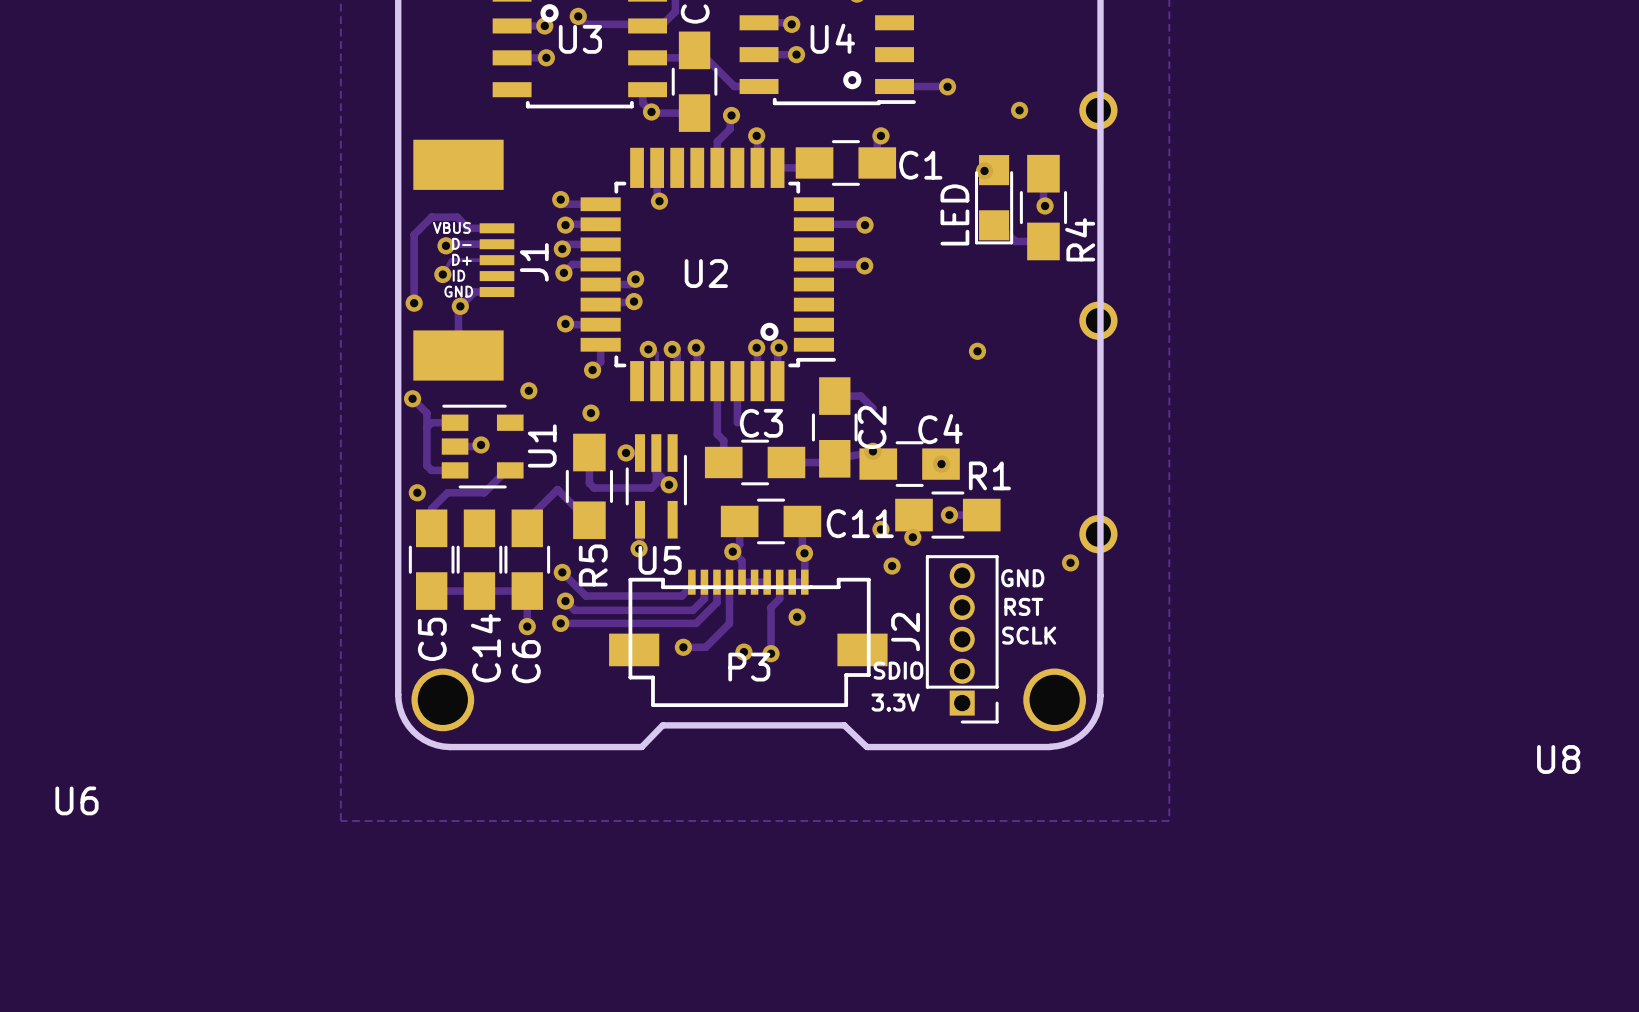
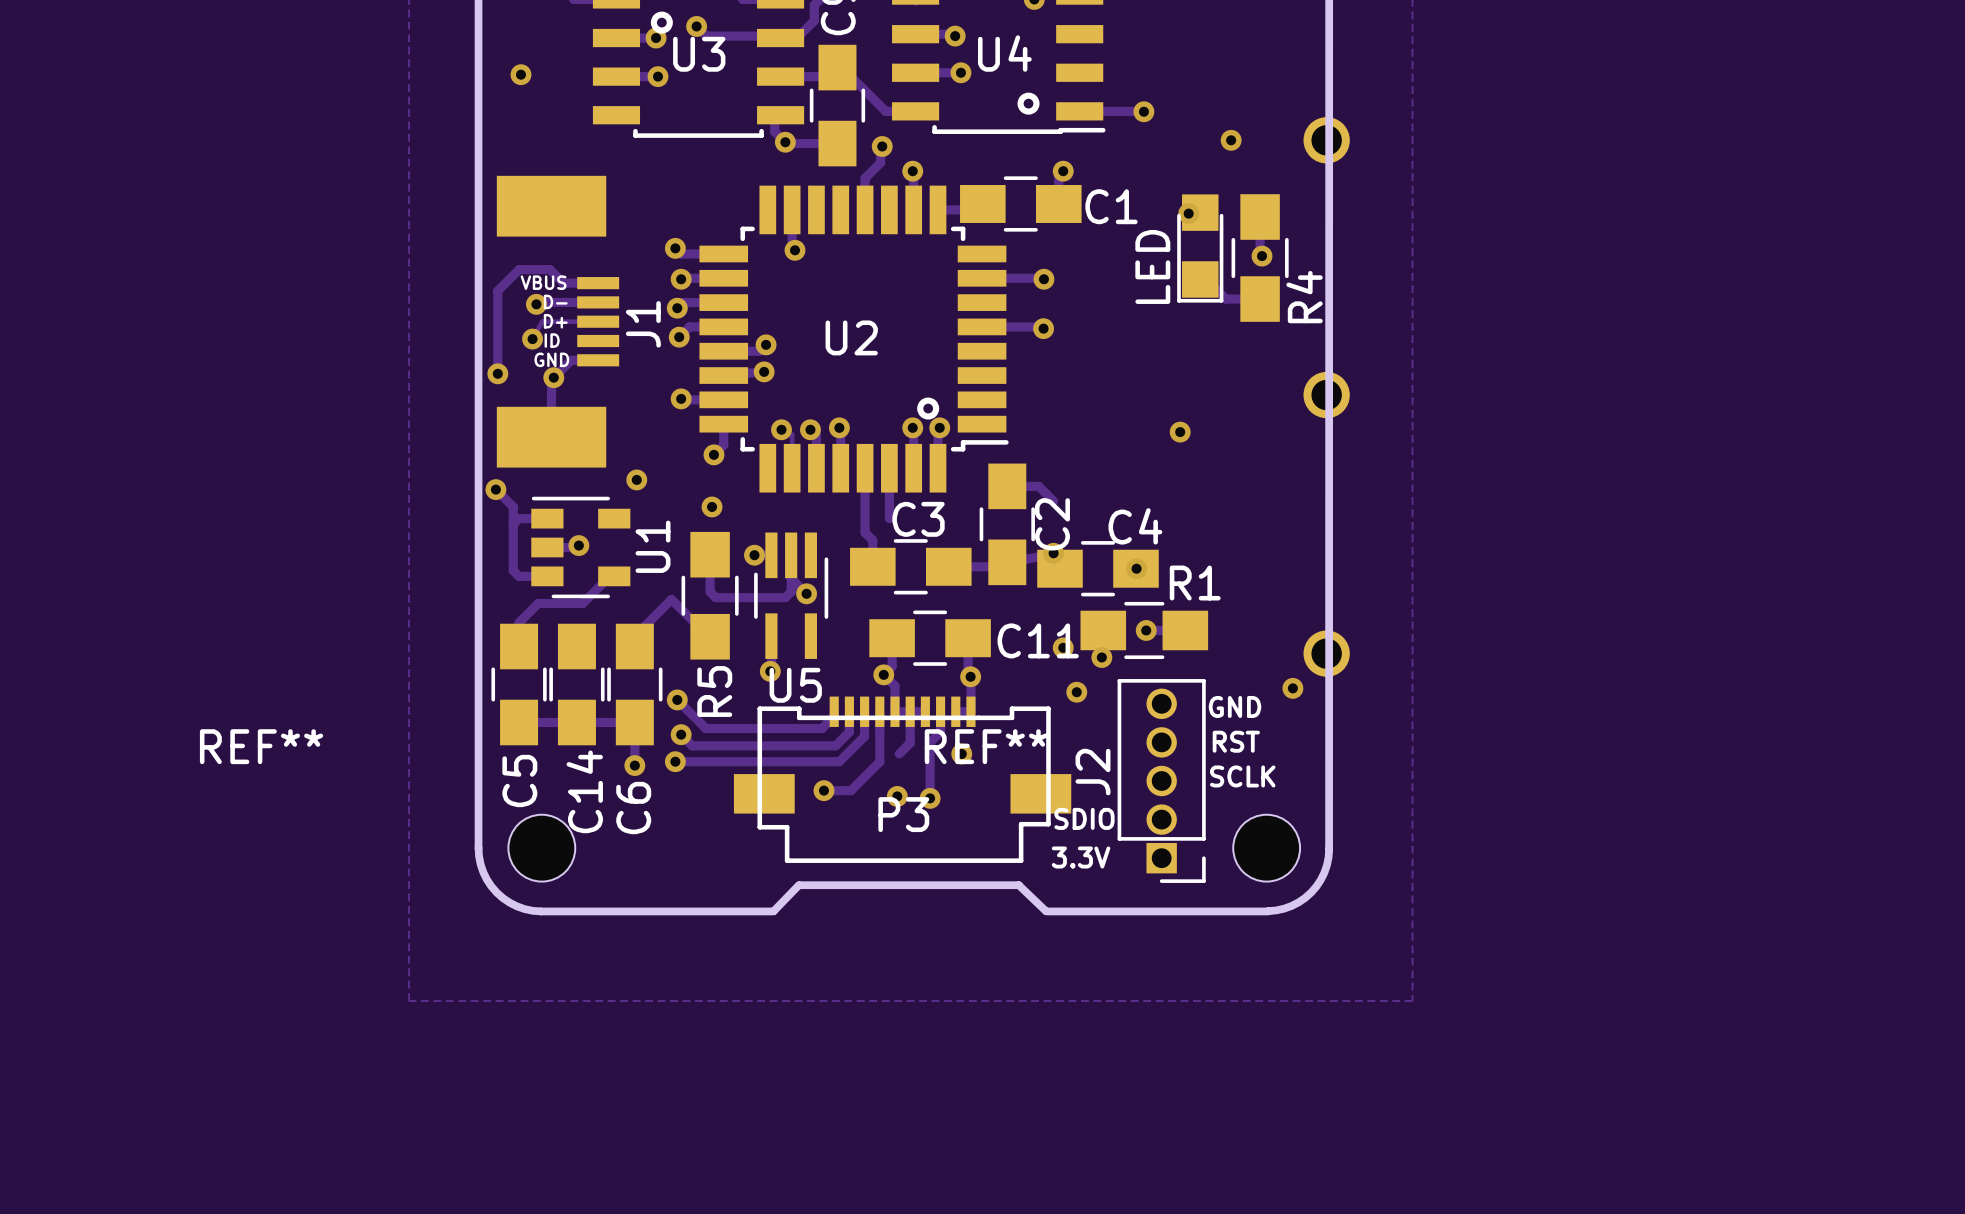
via: none -> (520, 74)
via: (417, 492) -> none
track: none -> (910, 711) (910, 743) (899, 753)
REF**: none -> (541, 848)
REF**: none -> (1266, 848)
U6: (442, 699) -> none
U8: (1054, 699) -> none

